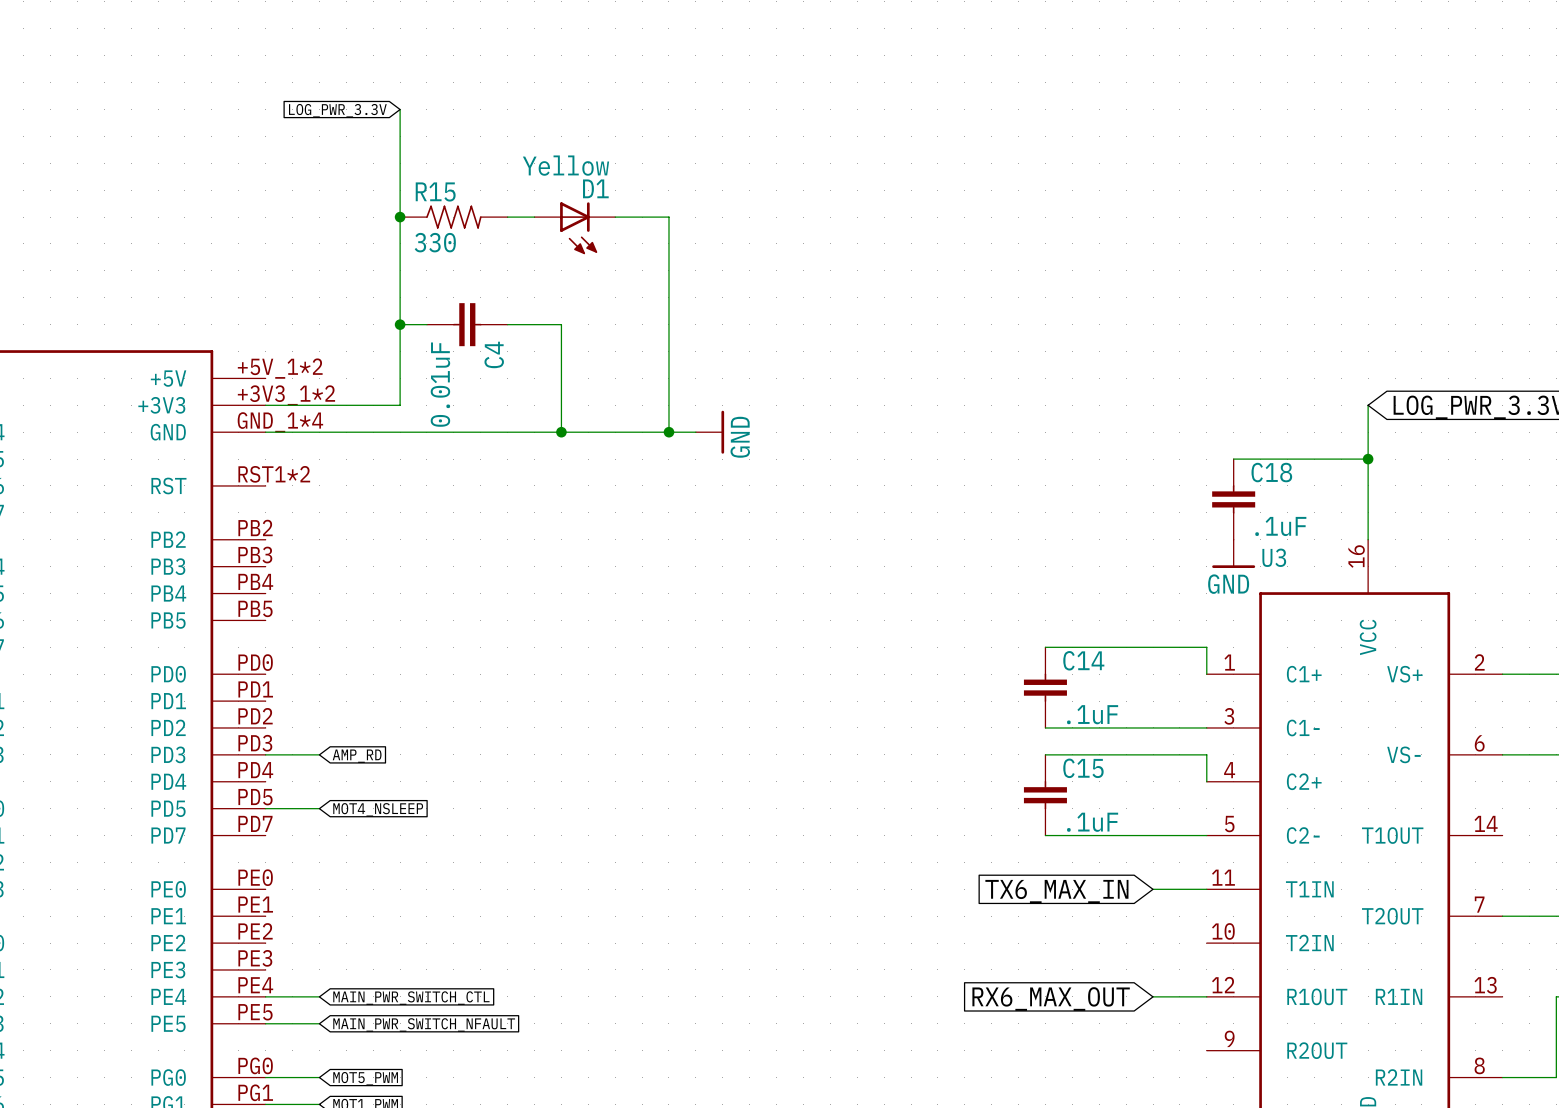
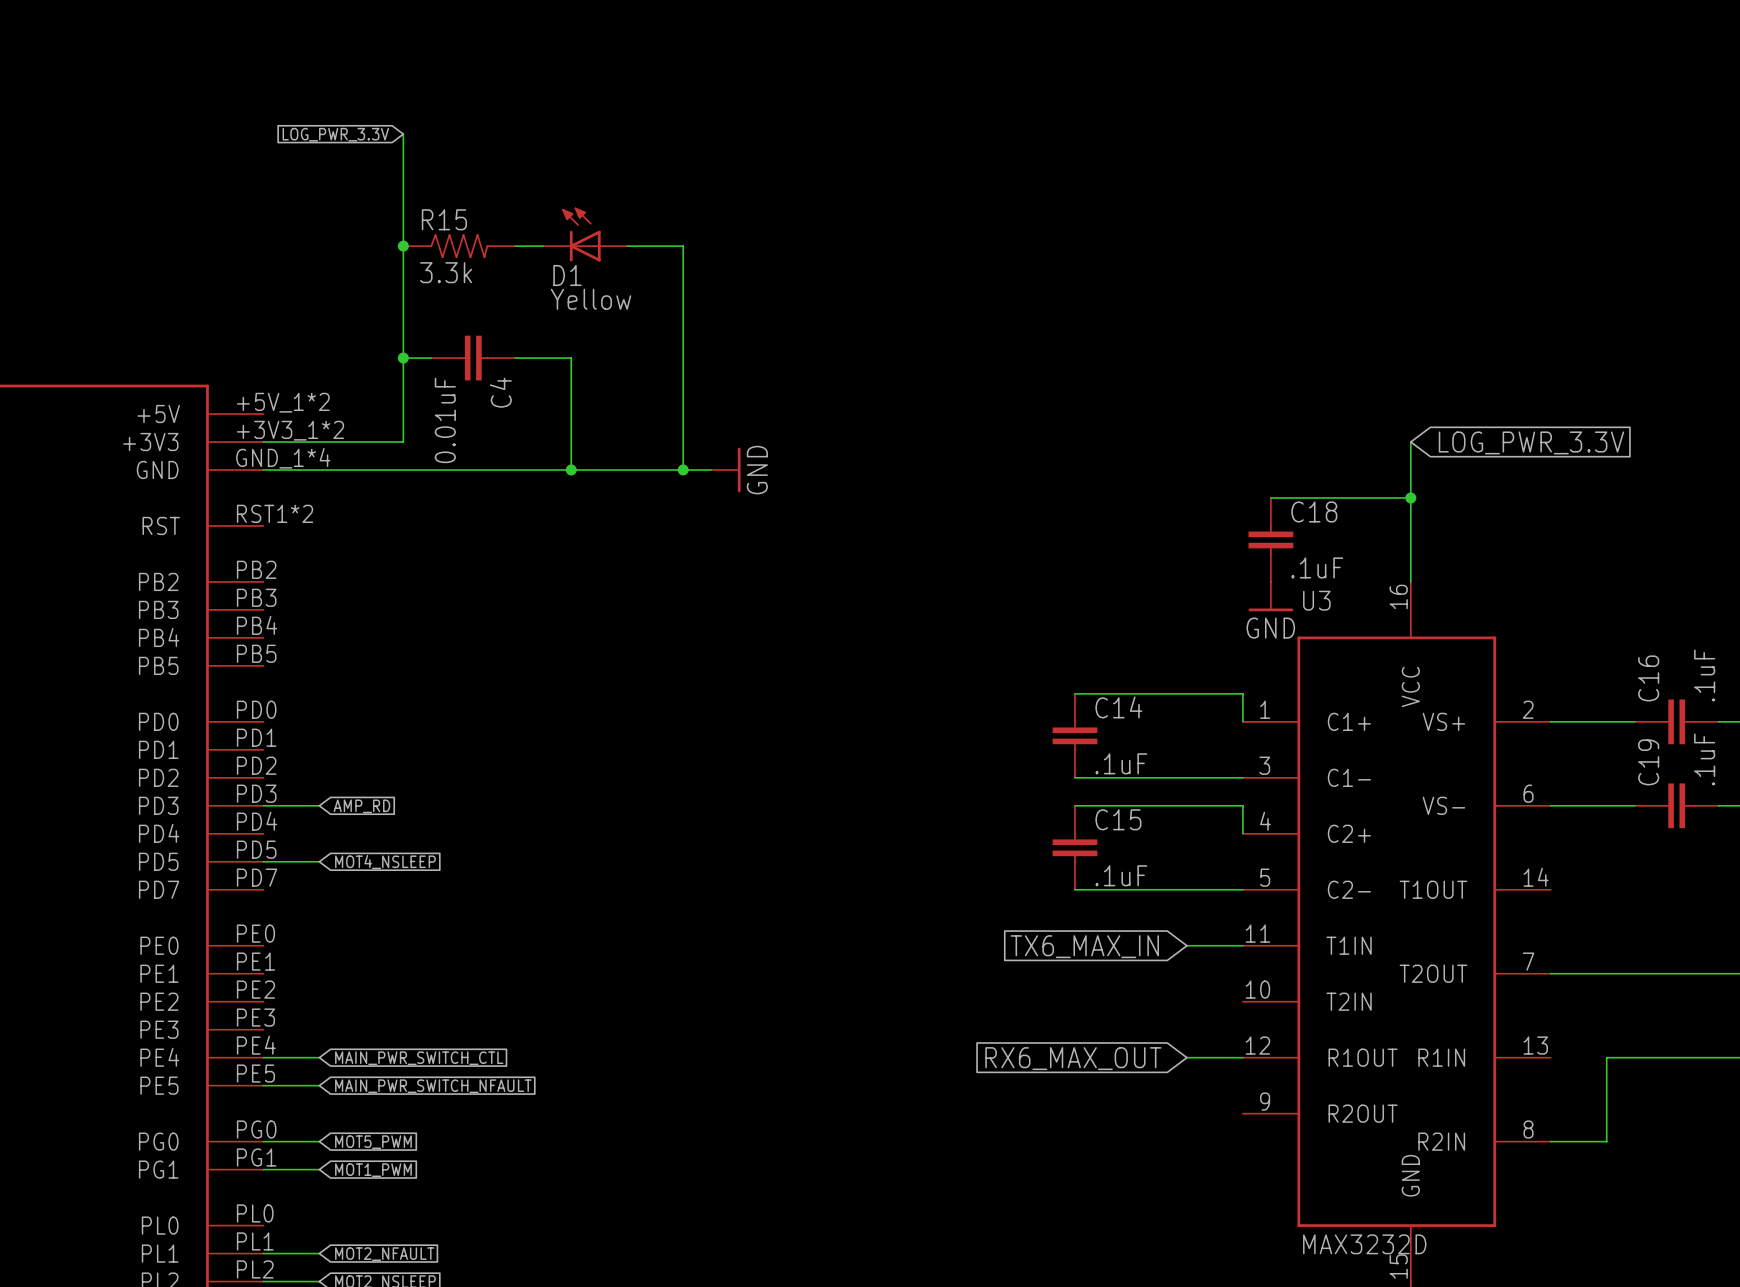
D1 rotation: 0° (578, 228) -> 180° (581, 234)
R15 value: 330 (435, 242) -> 3.3k (446, 272)

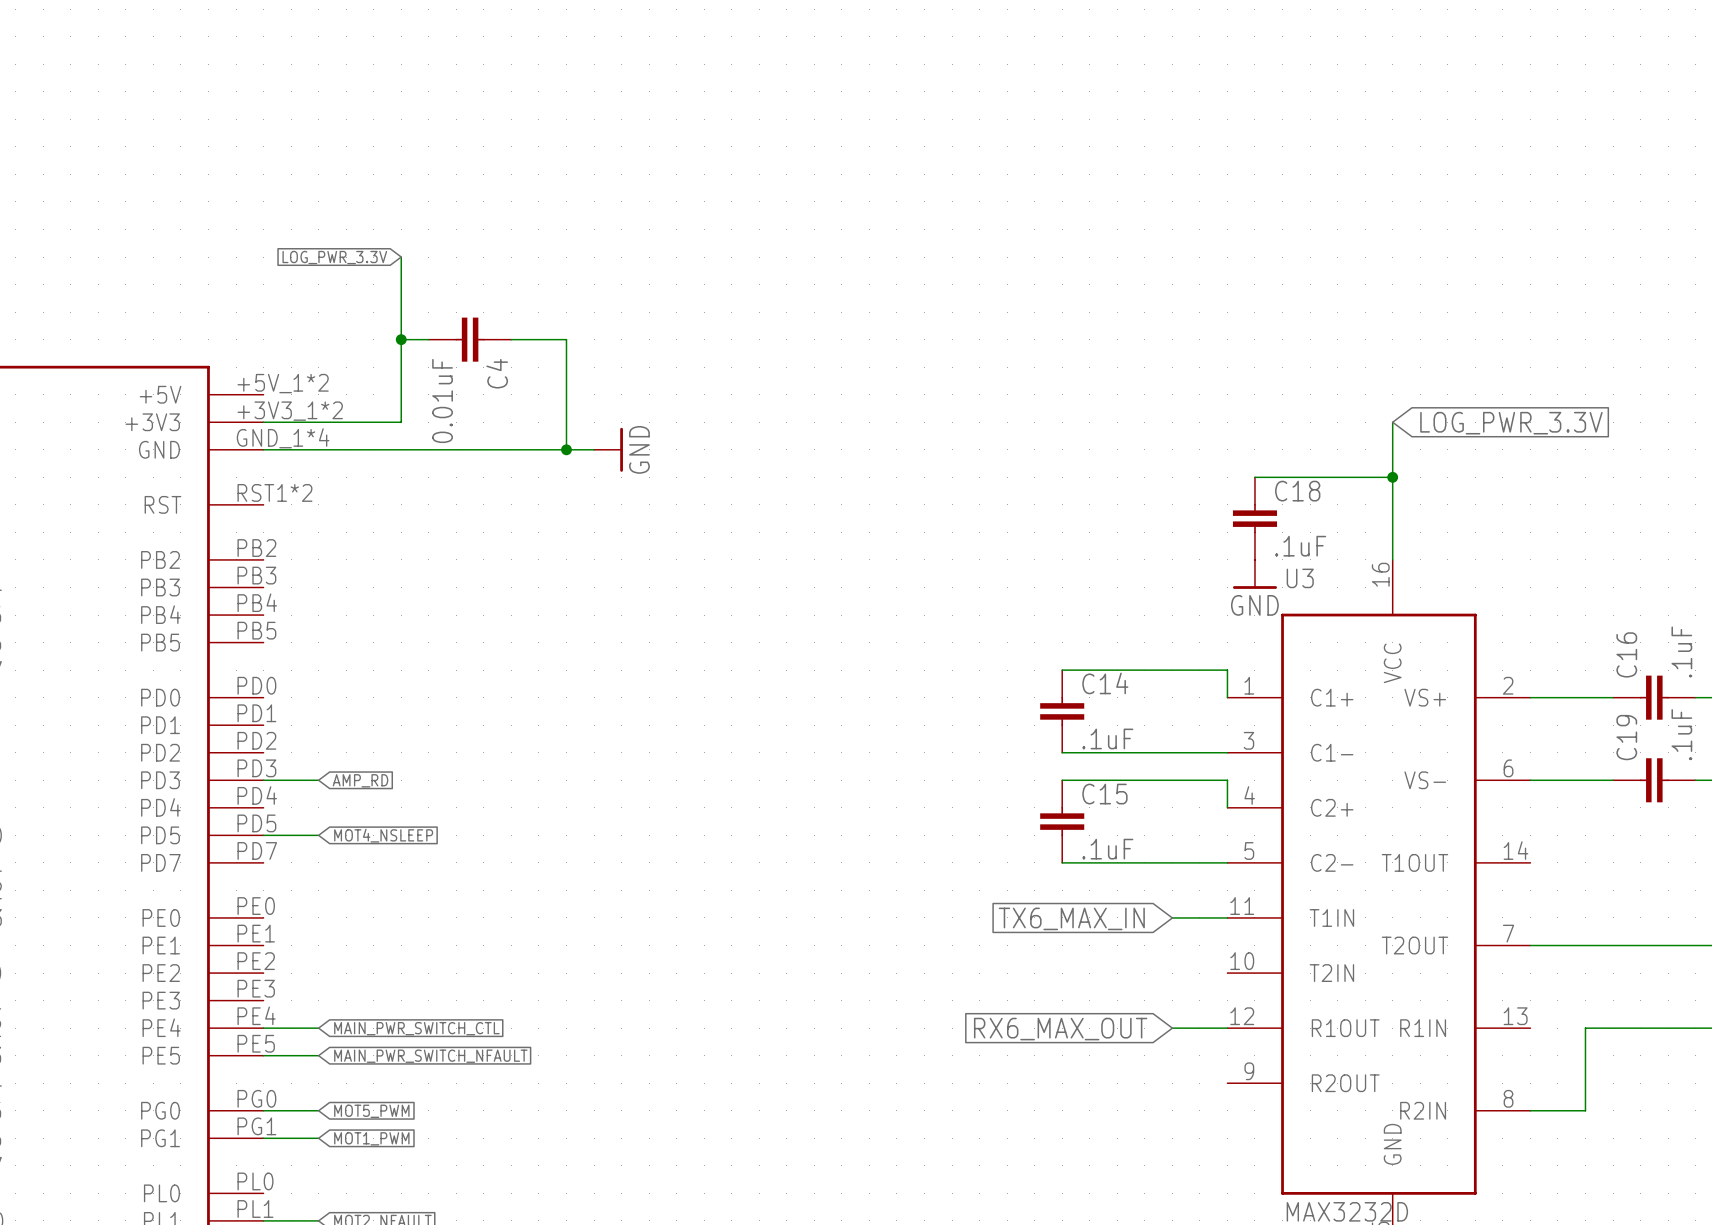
global label position: LOG_PWR_3.3V (335, 134) -> LOG_PWR_3.3V (334, 257)
wire: (403, 134) (403, 274) -> none
D1: Yellow (585, 234) -> none
junction: (403, 246) -> none
R15: 3.3k (459, 246) -> none
wire: (515, 246) (543, 246) -> none
wire: (627, 246) (683, 246) (683, 469) -> none
wire: (599, 469) (711, 469) -> none
junction: (683, 469) -> none
power symbol position: GND (725, 469) -> GND (608, 449)

